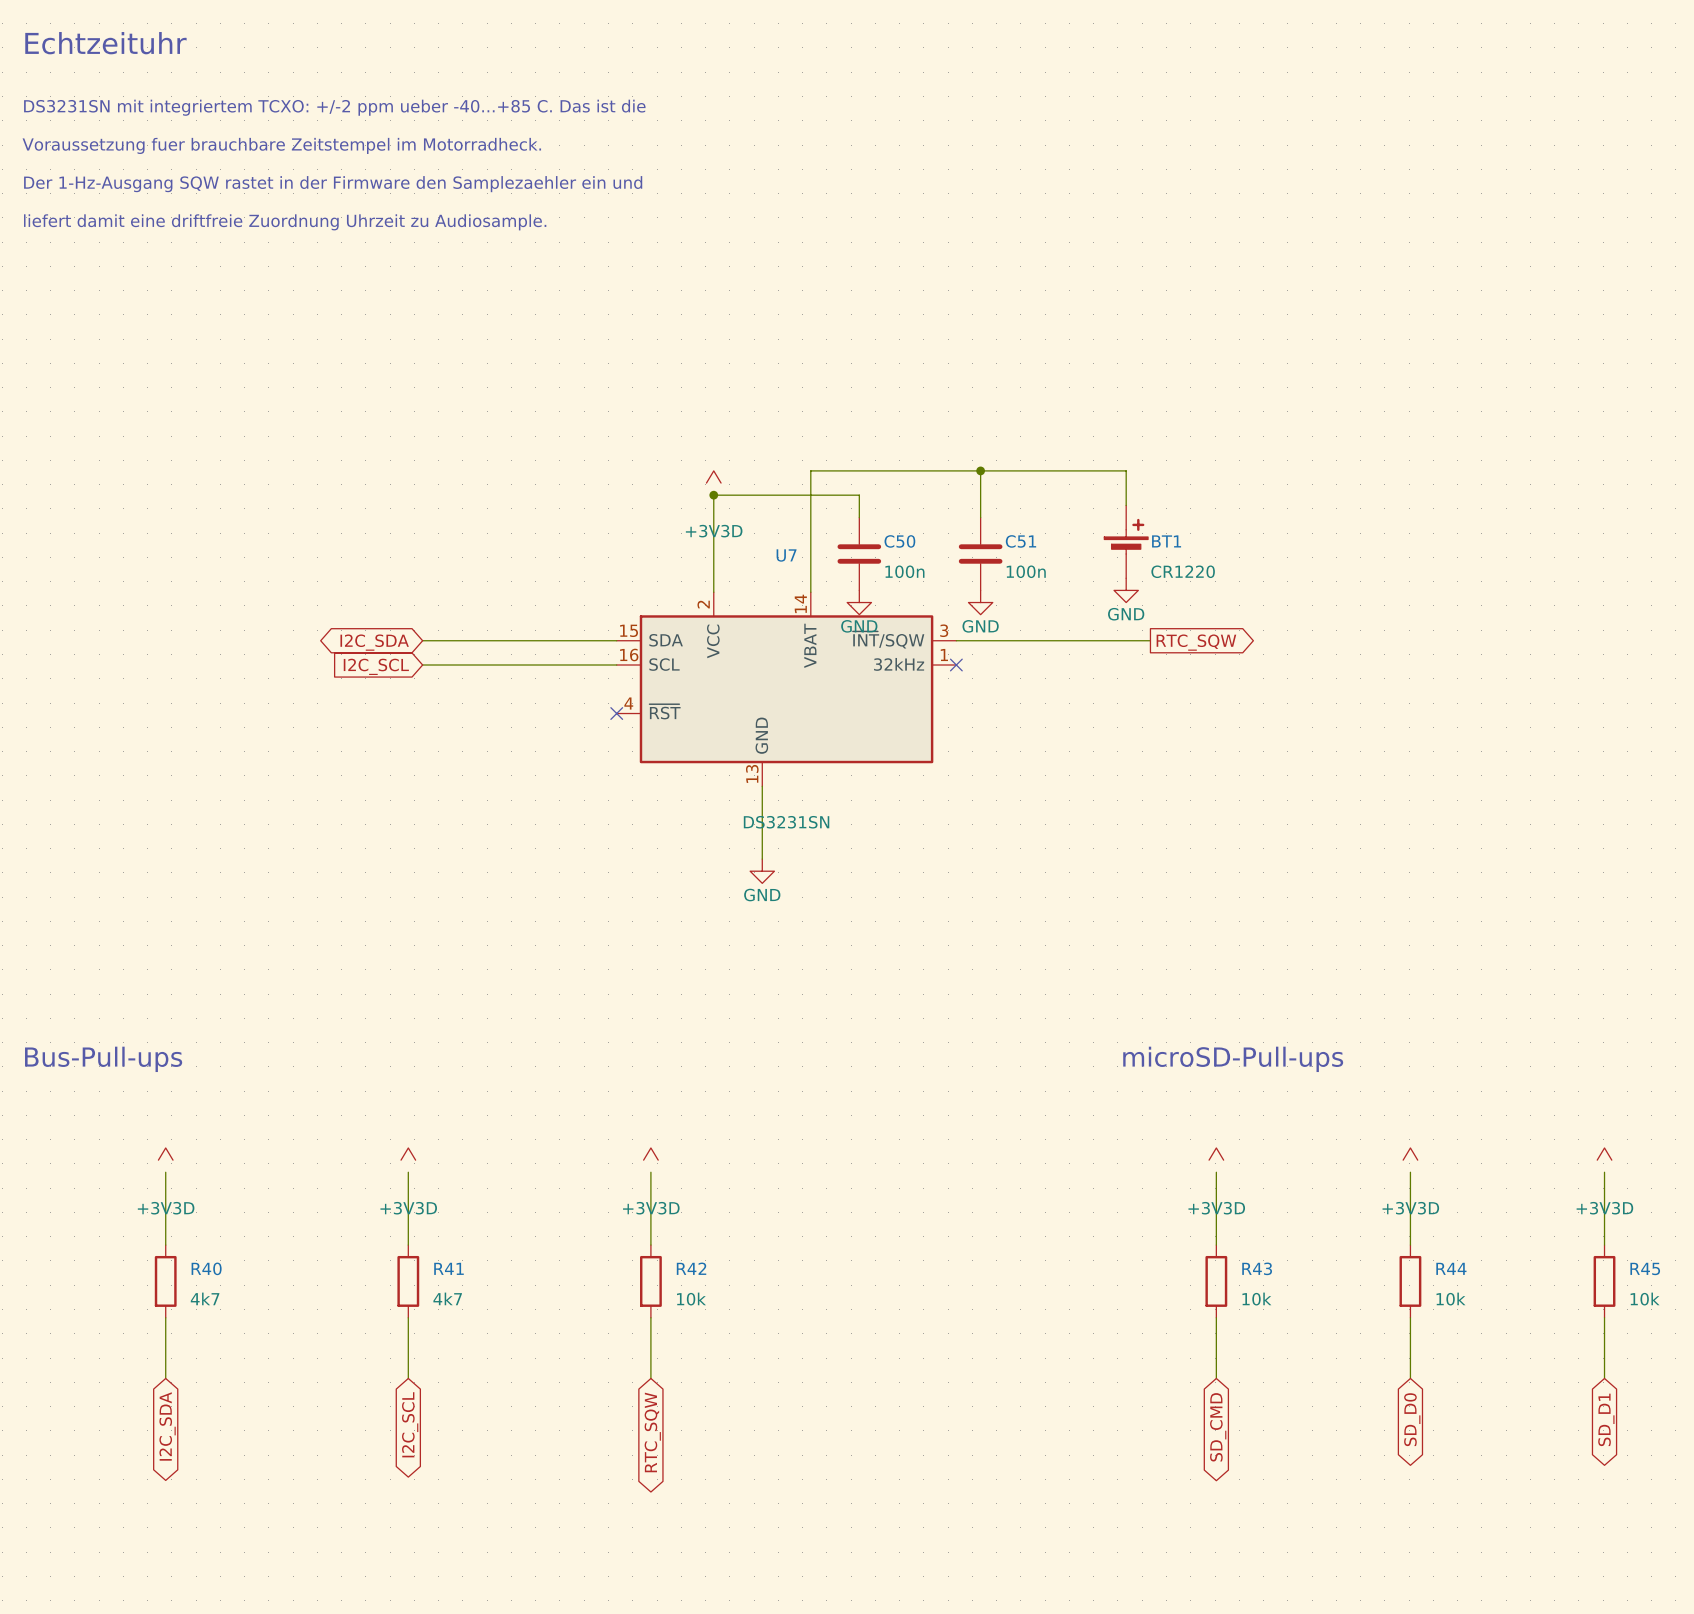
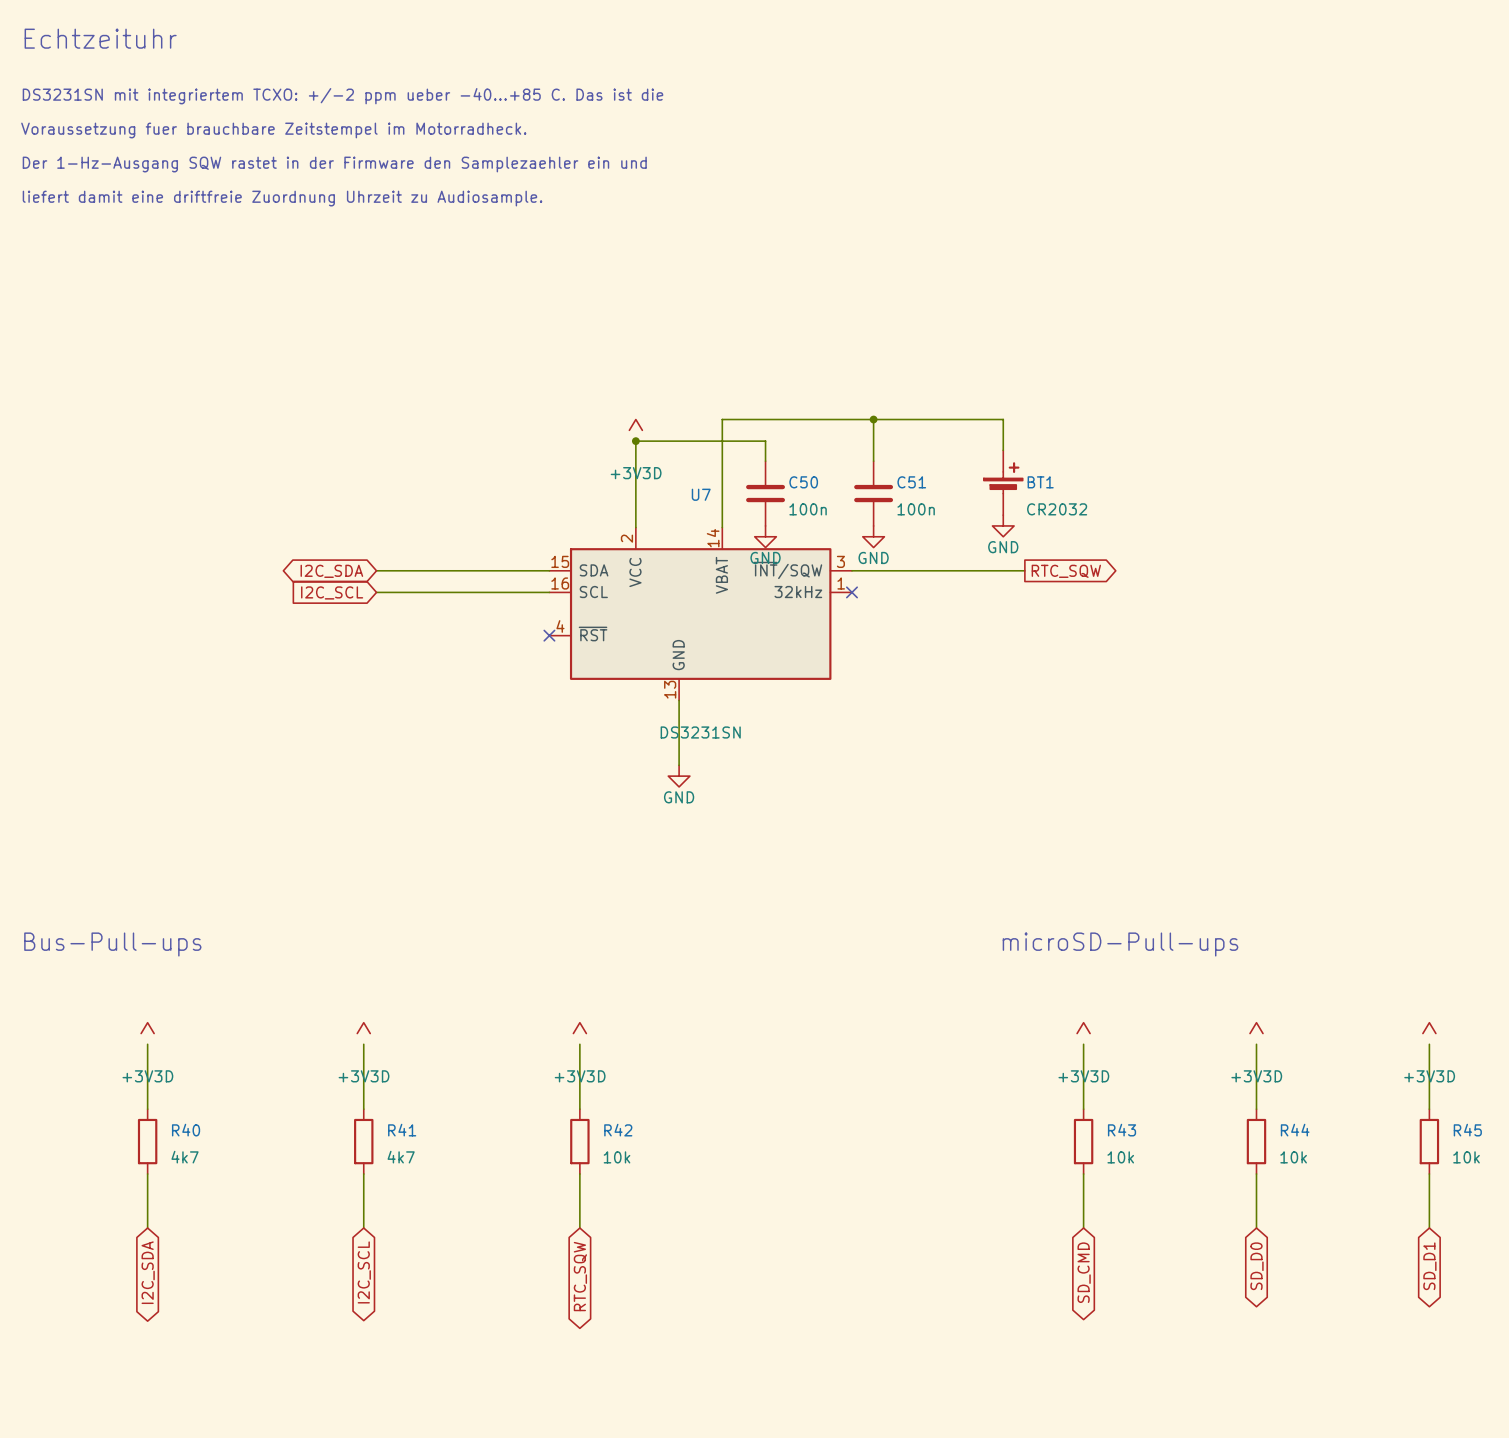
BT1 value: CR1220 (1183, 571) -> CR2032 (1057, 509)

